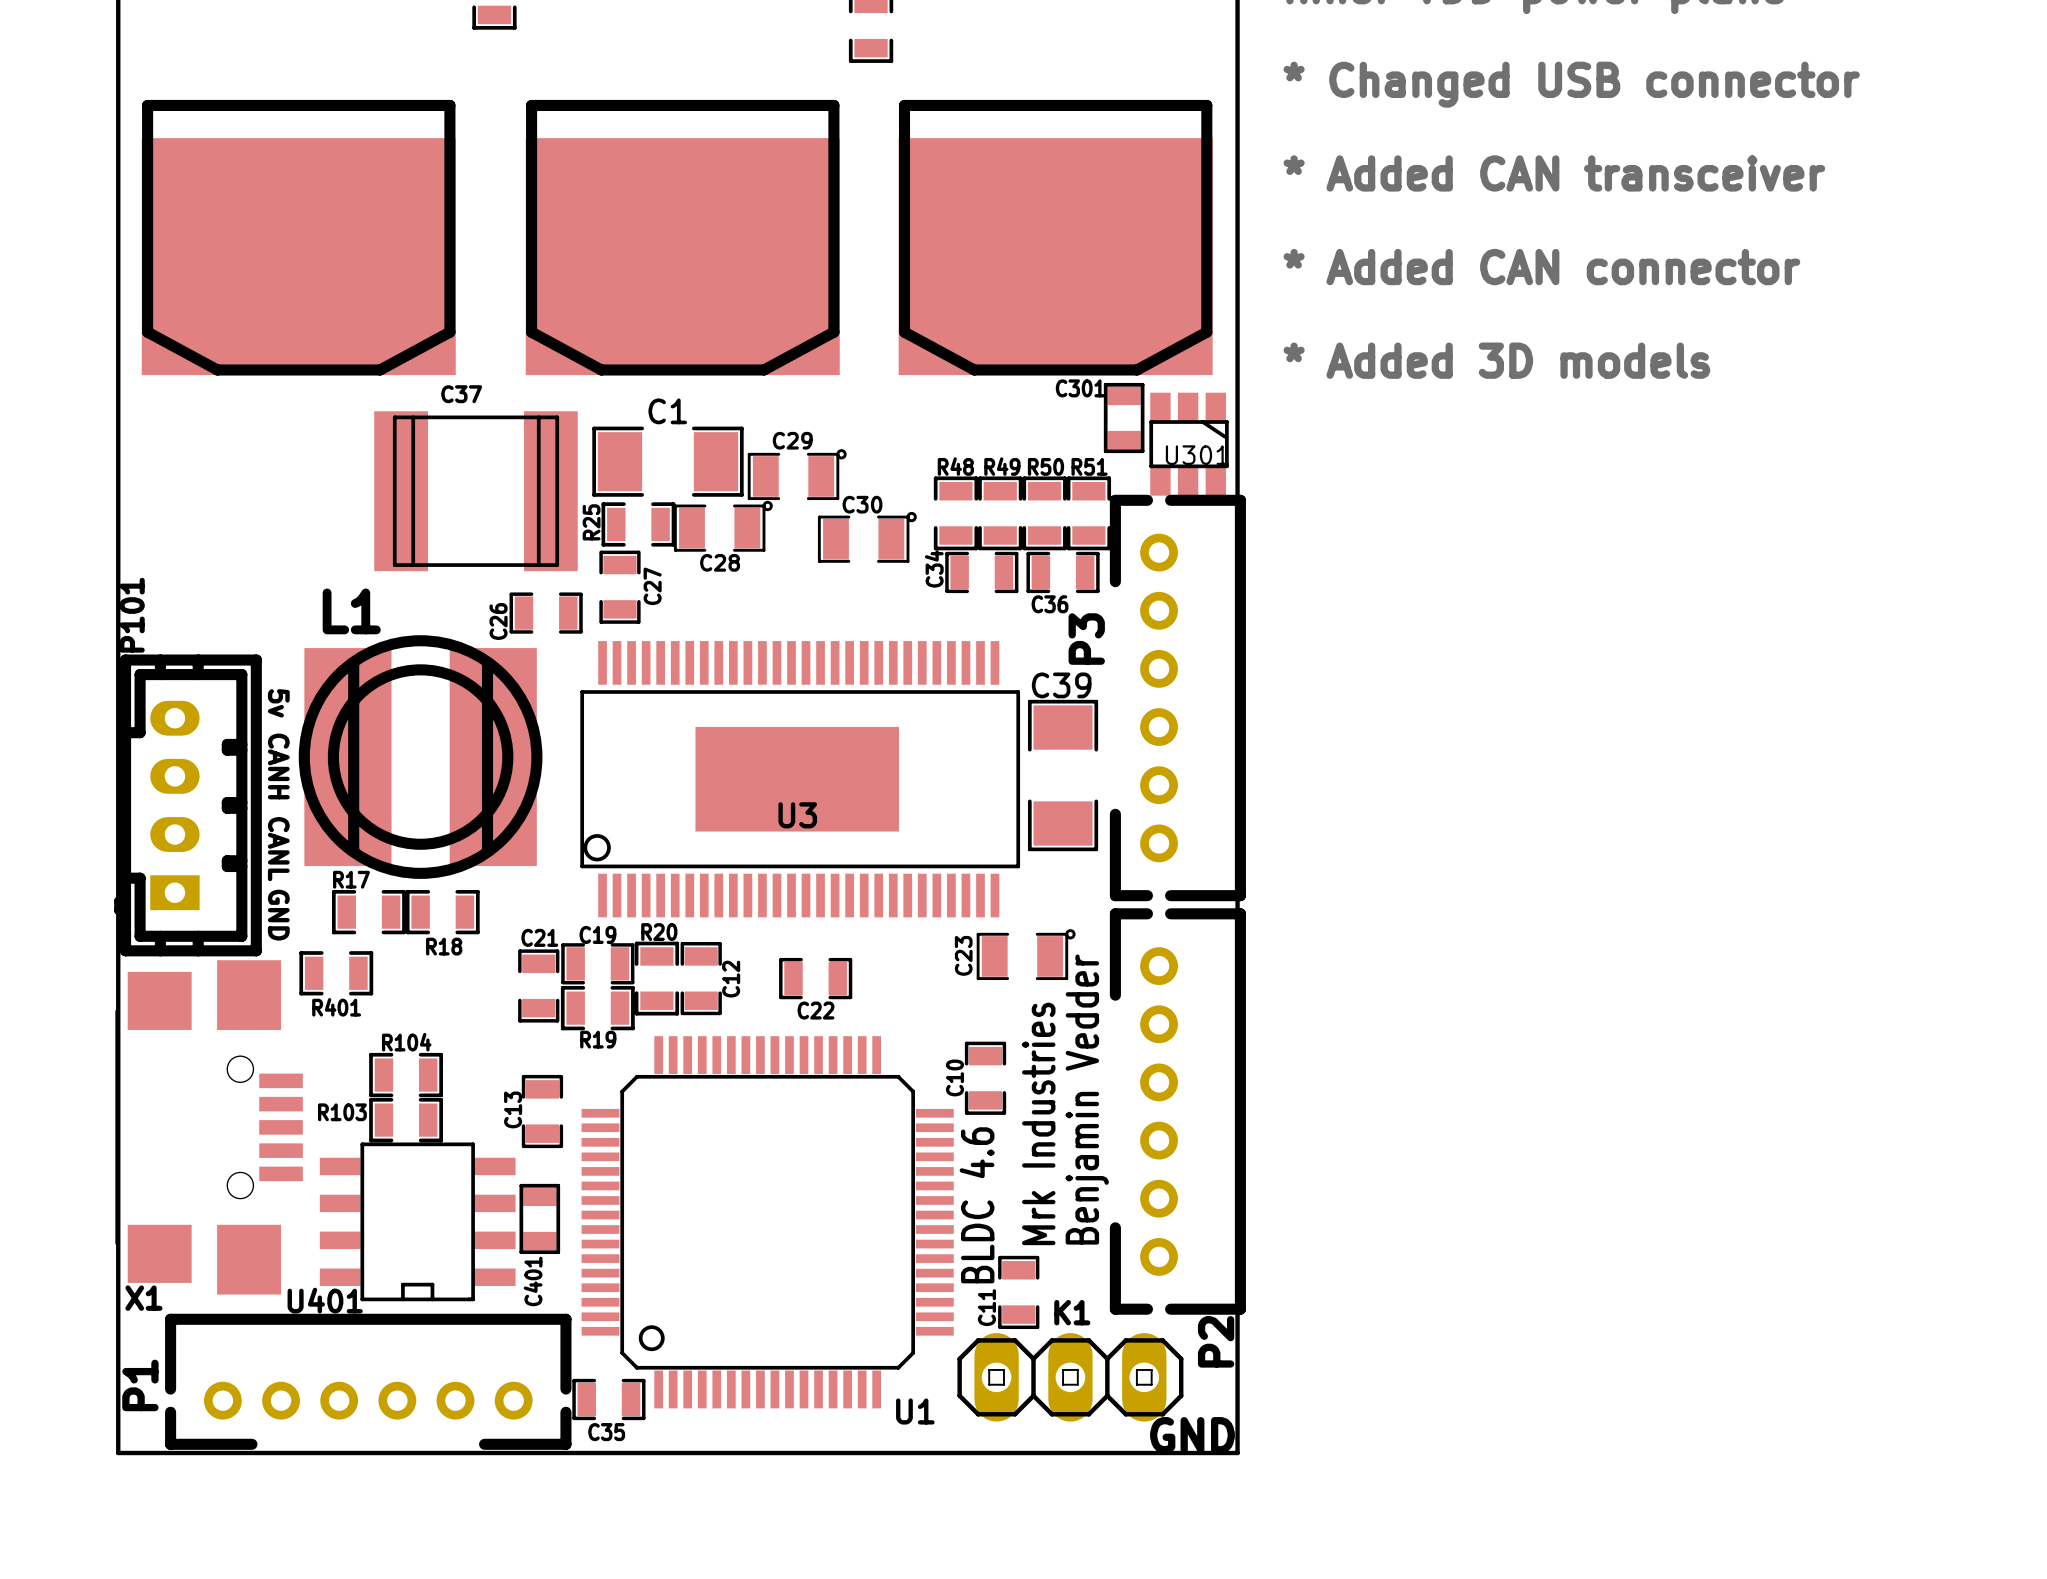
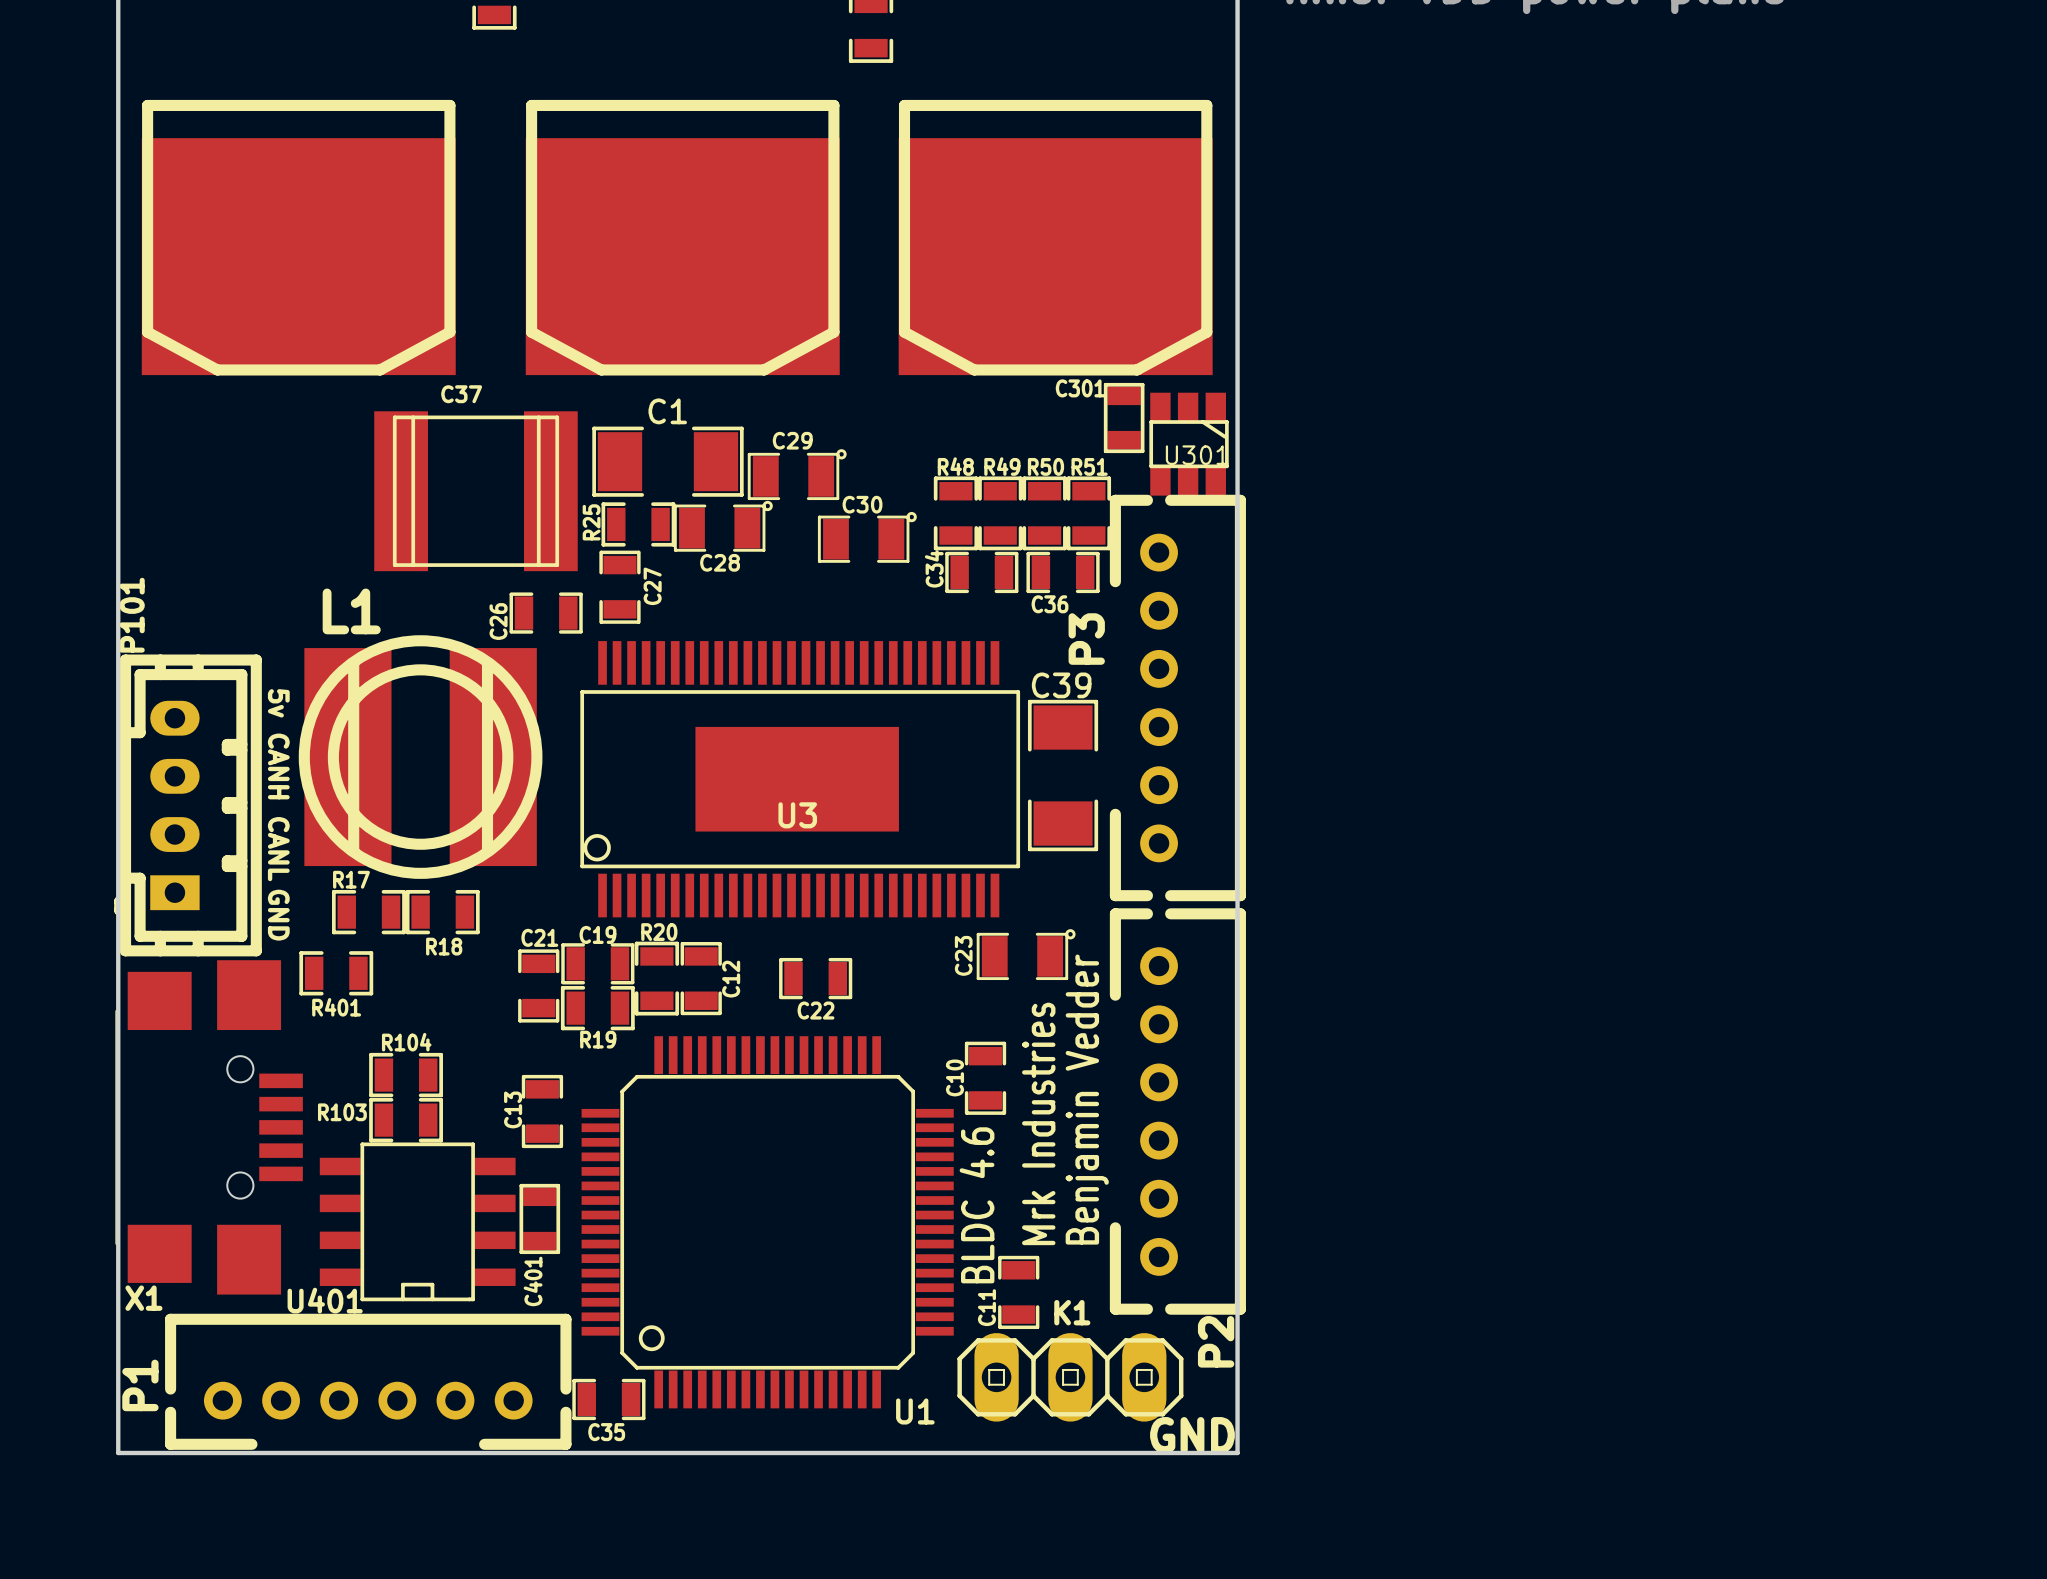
text: * Changed USB connector (1571, 84) -> none
text: * Added CAN transceiver (1554, 173) -> none
text: * Added CAN connector (1541, 267) -> none
text: * Added 3D models (1496, 360) -> none

